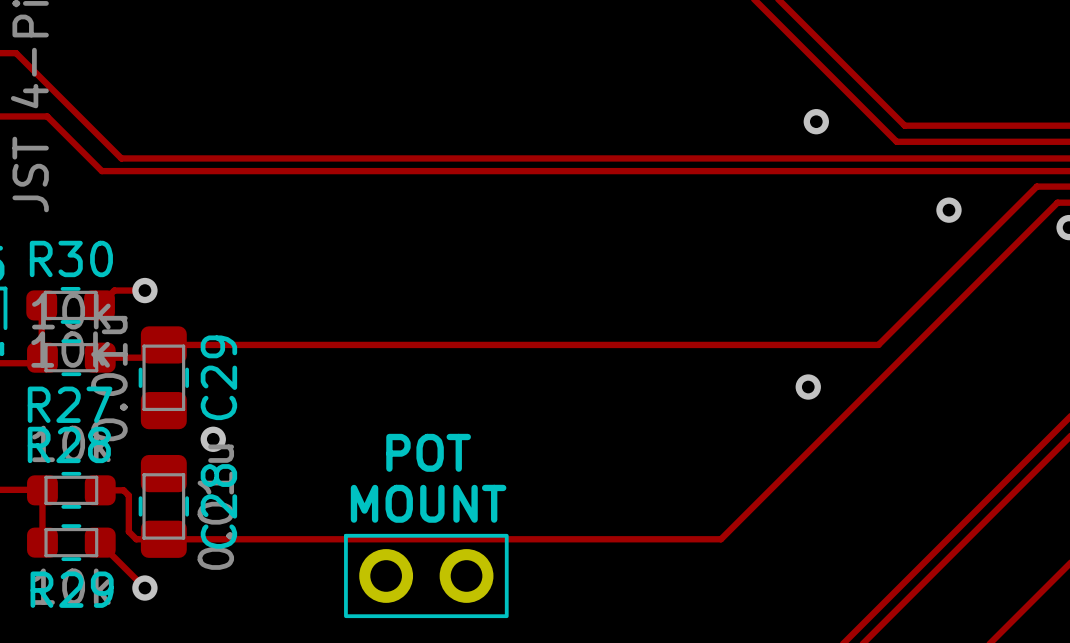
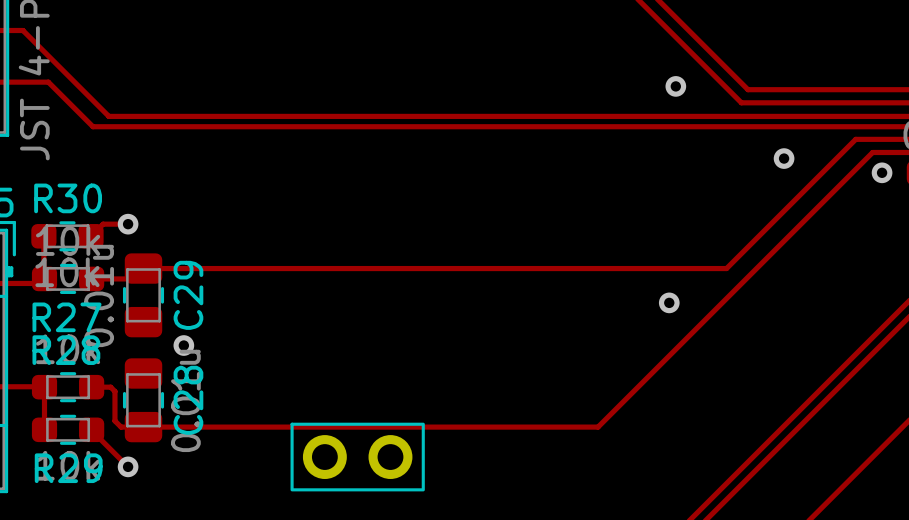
text: POT (428, 452) -> none
text: MOUNT (428, 503) -> none

